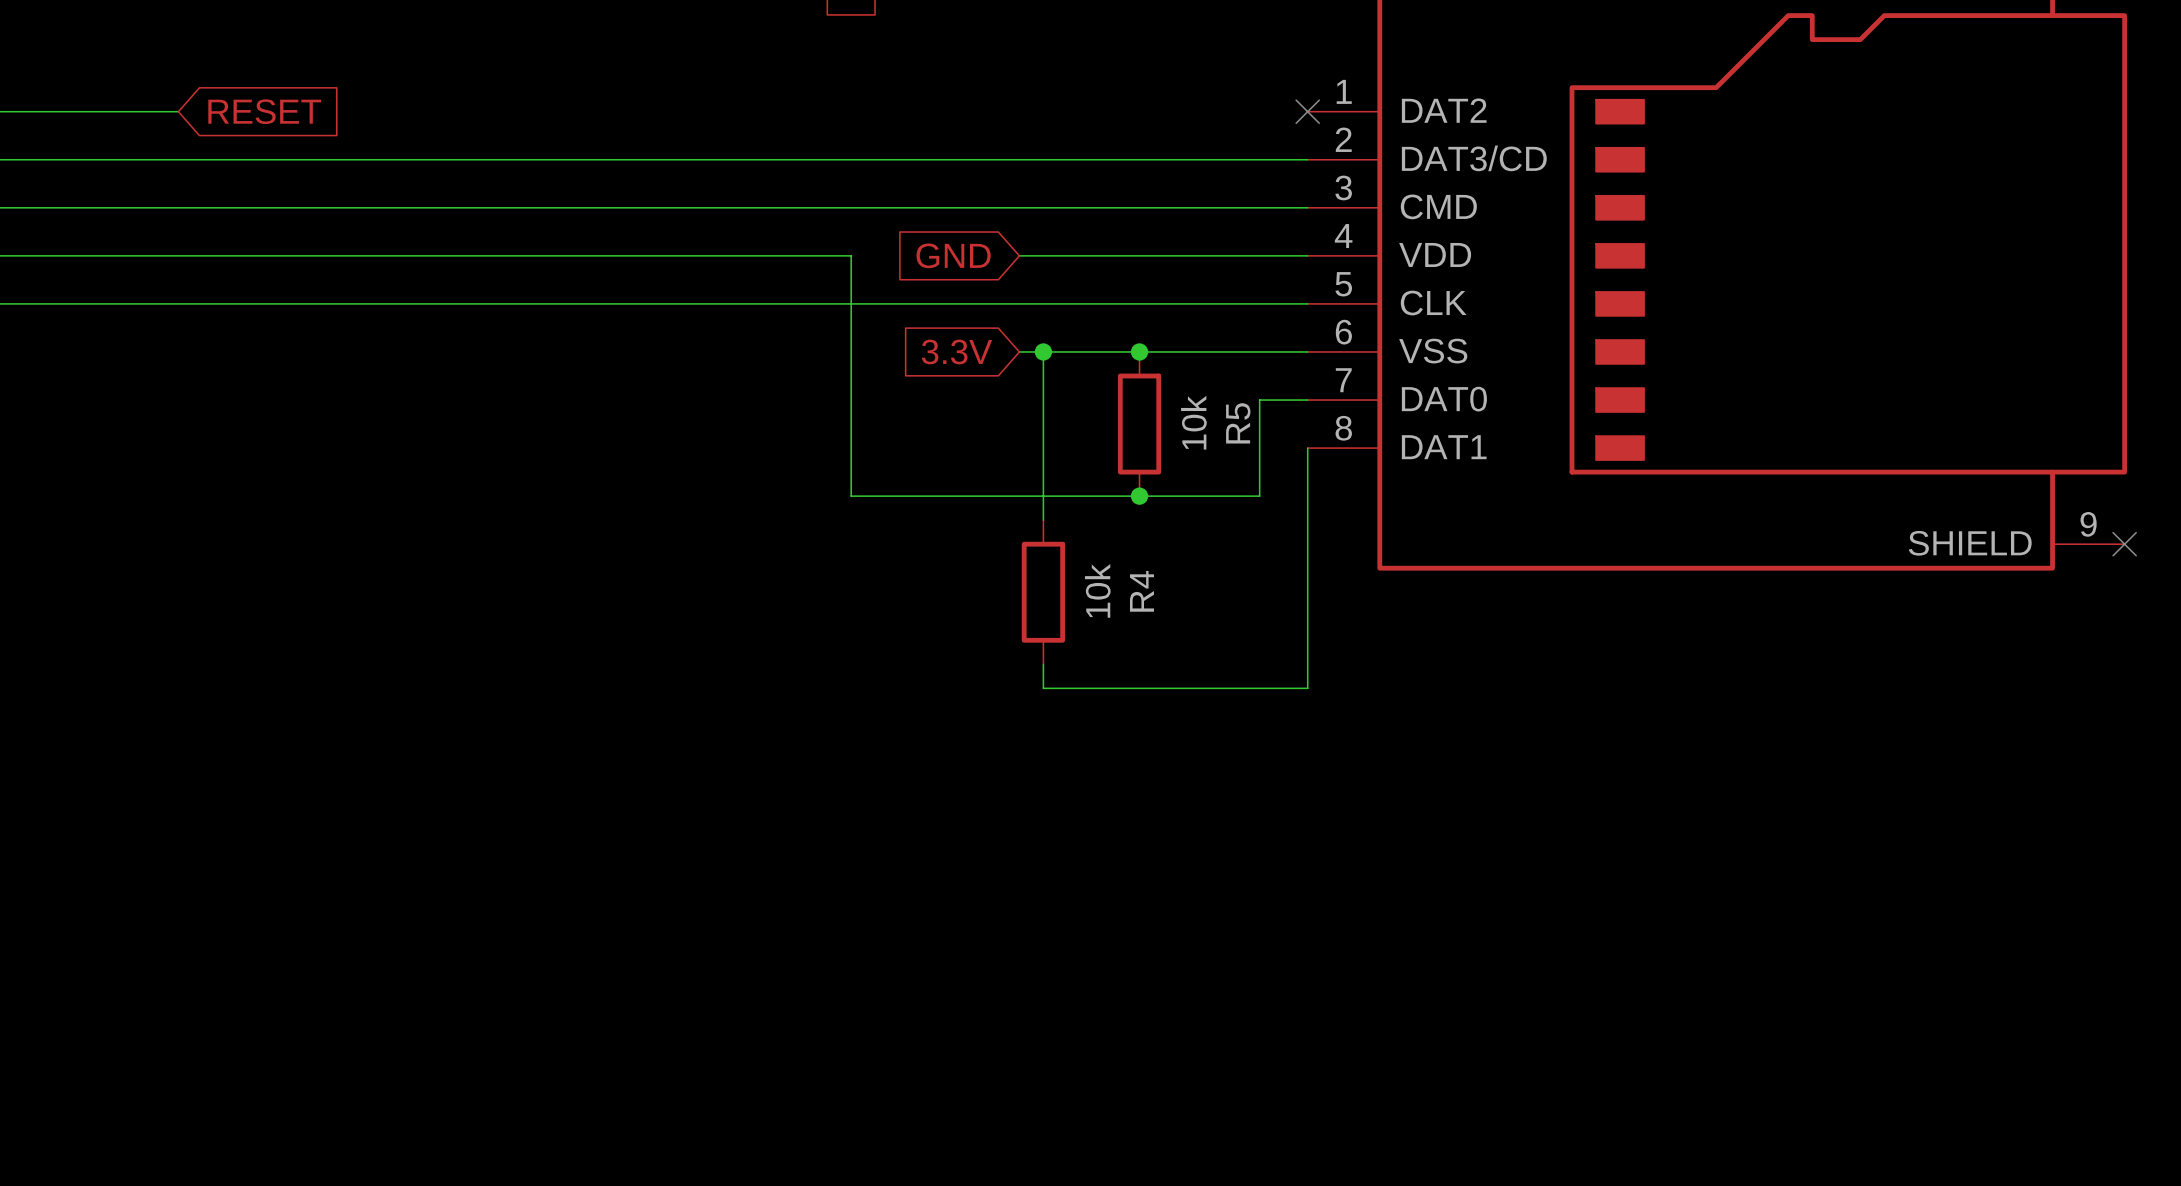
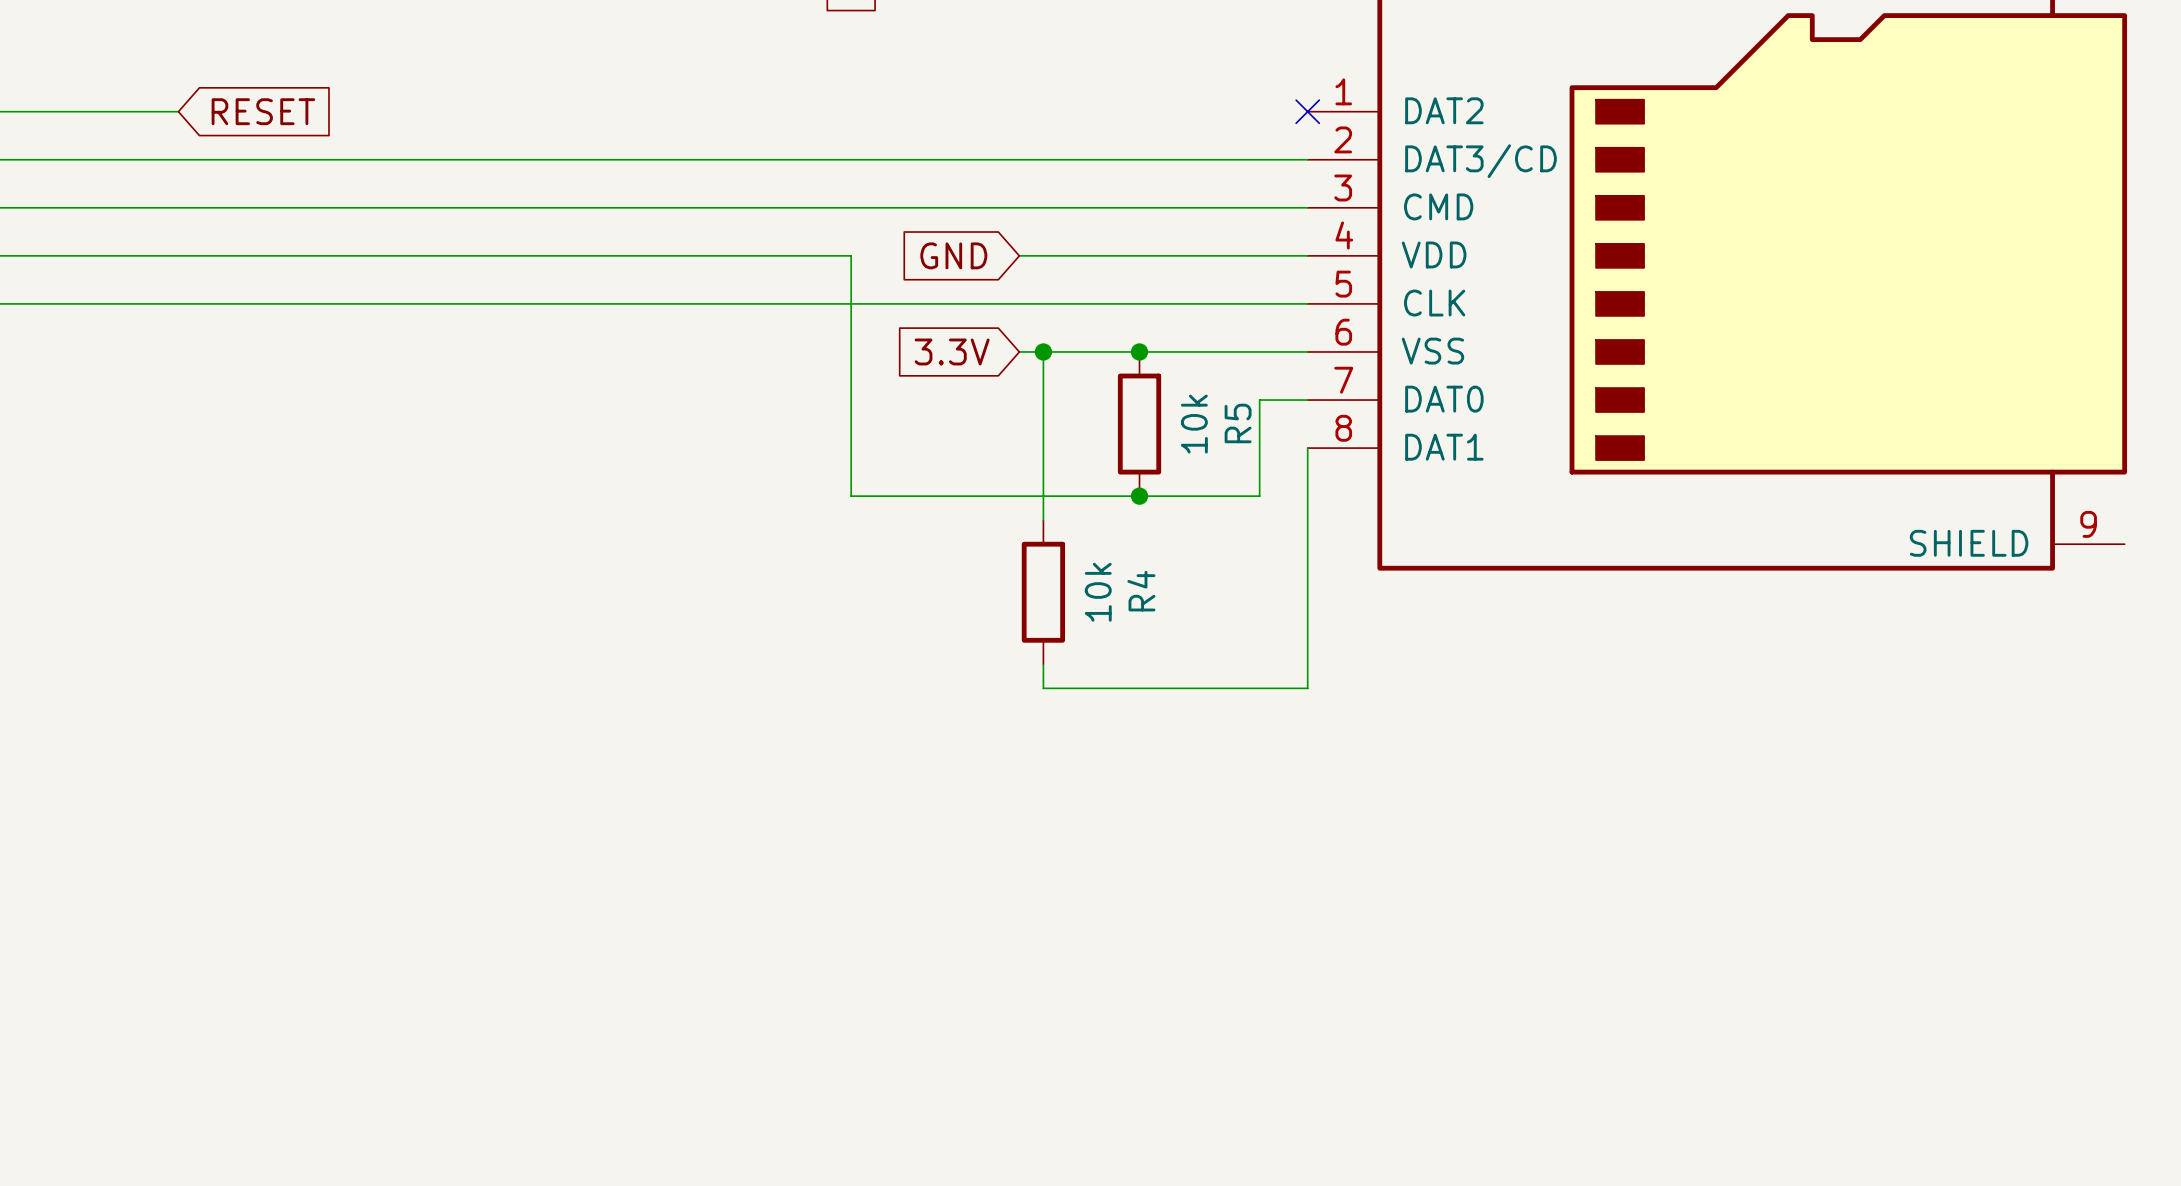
no-connect mark: (2124, 544) -> none

